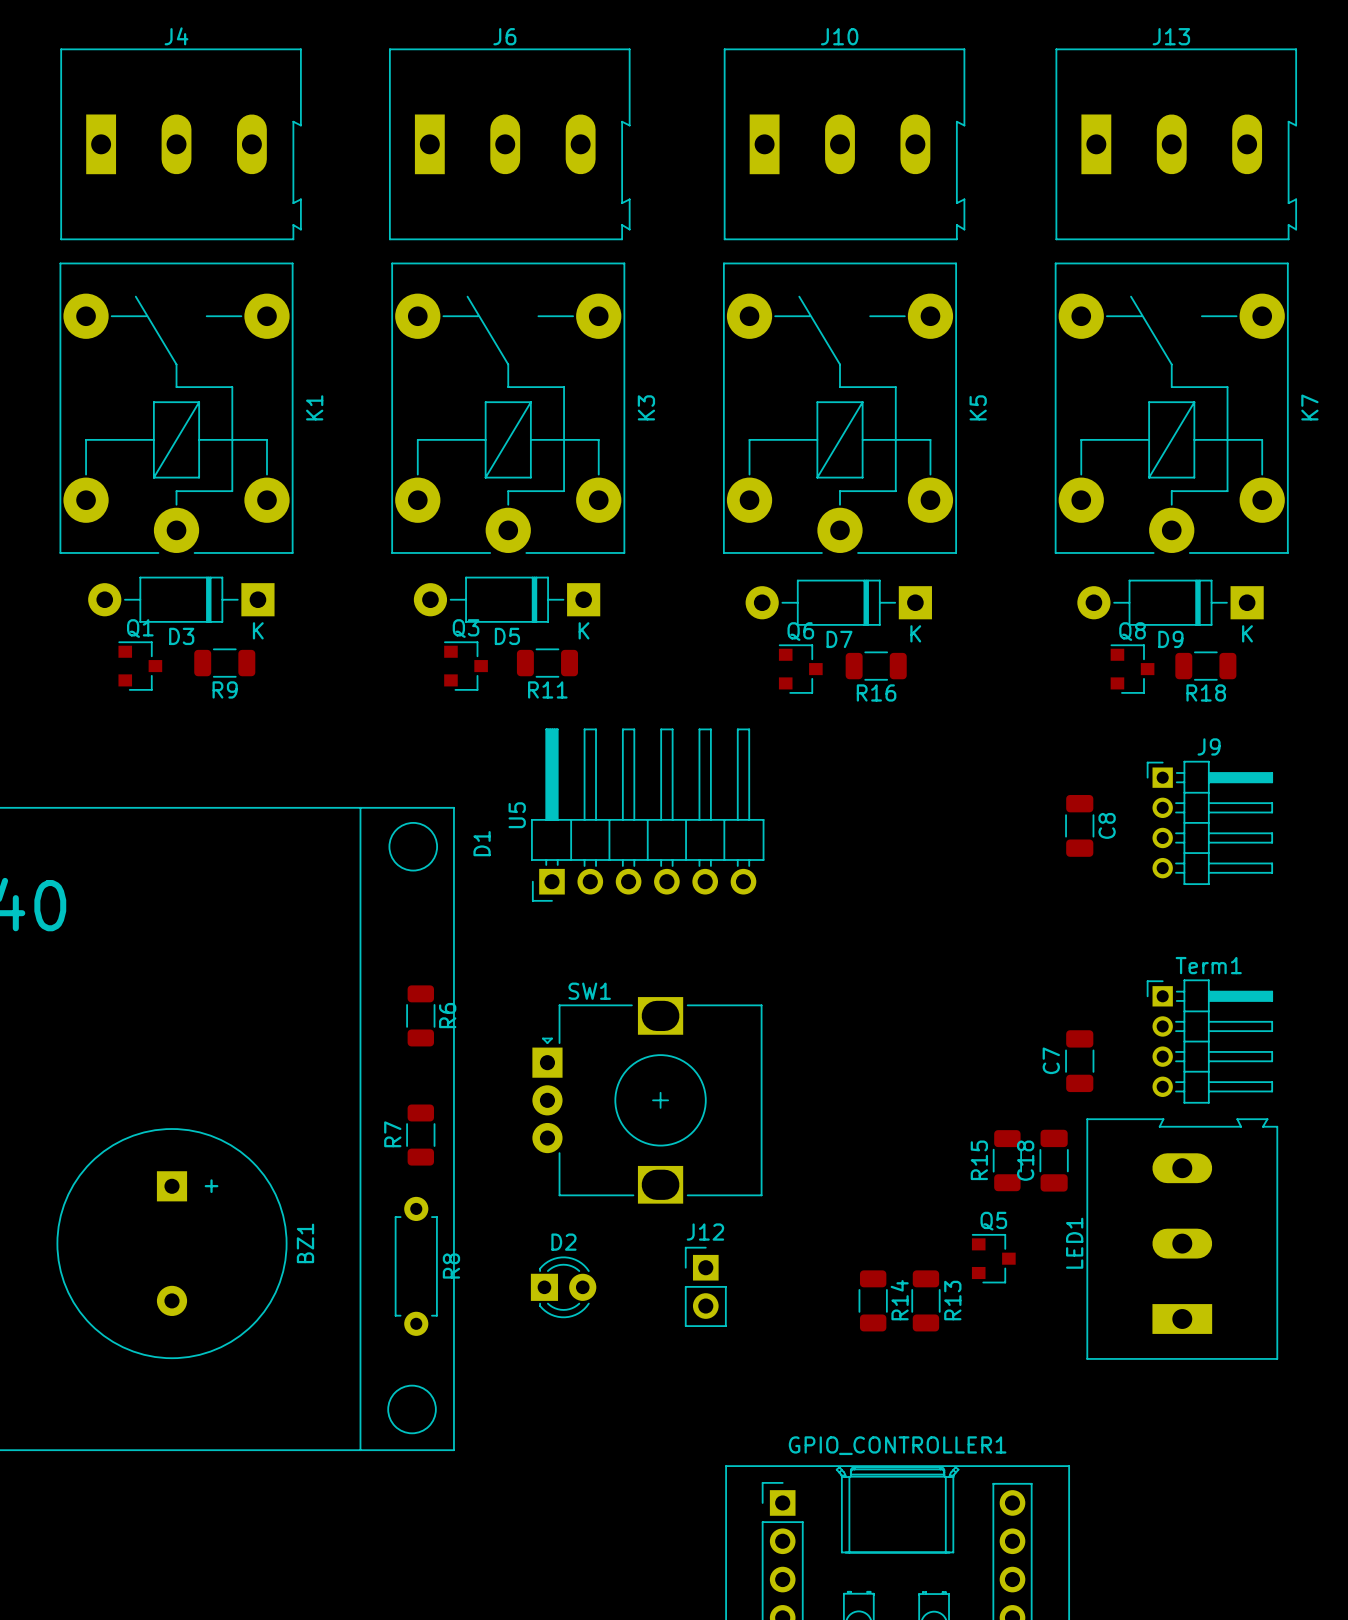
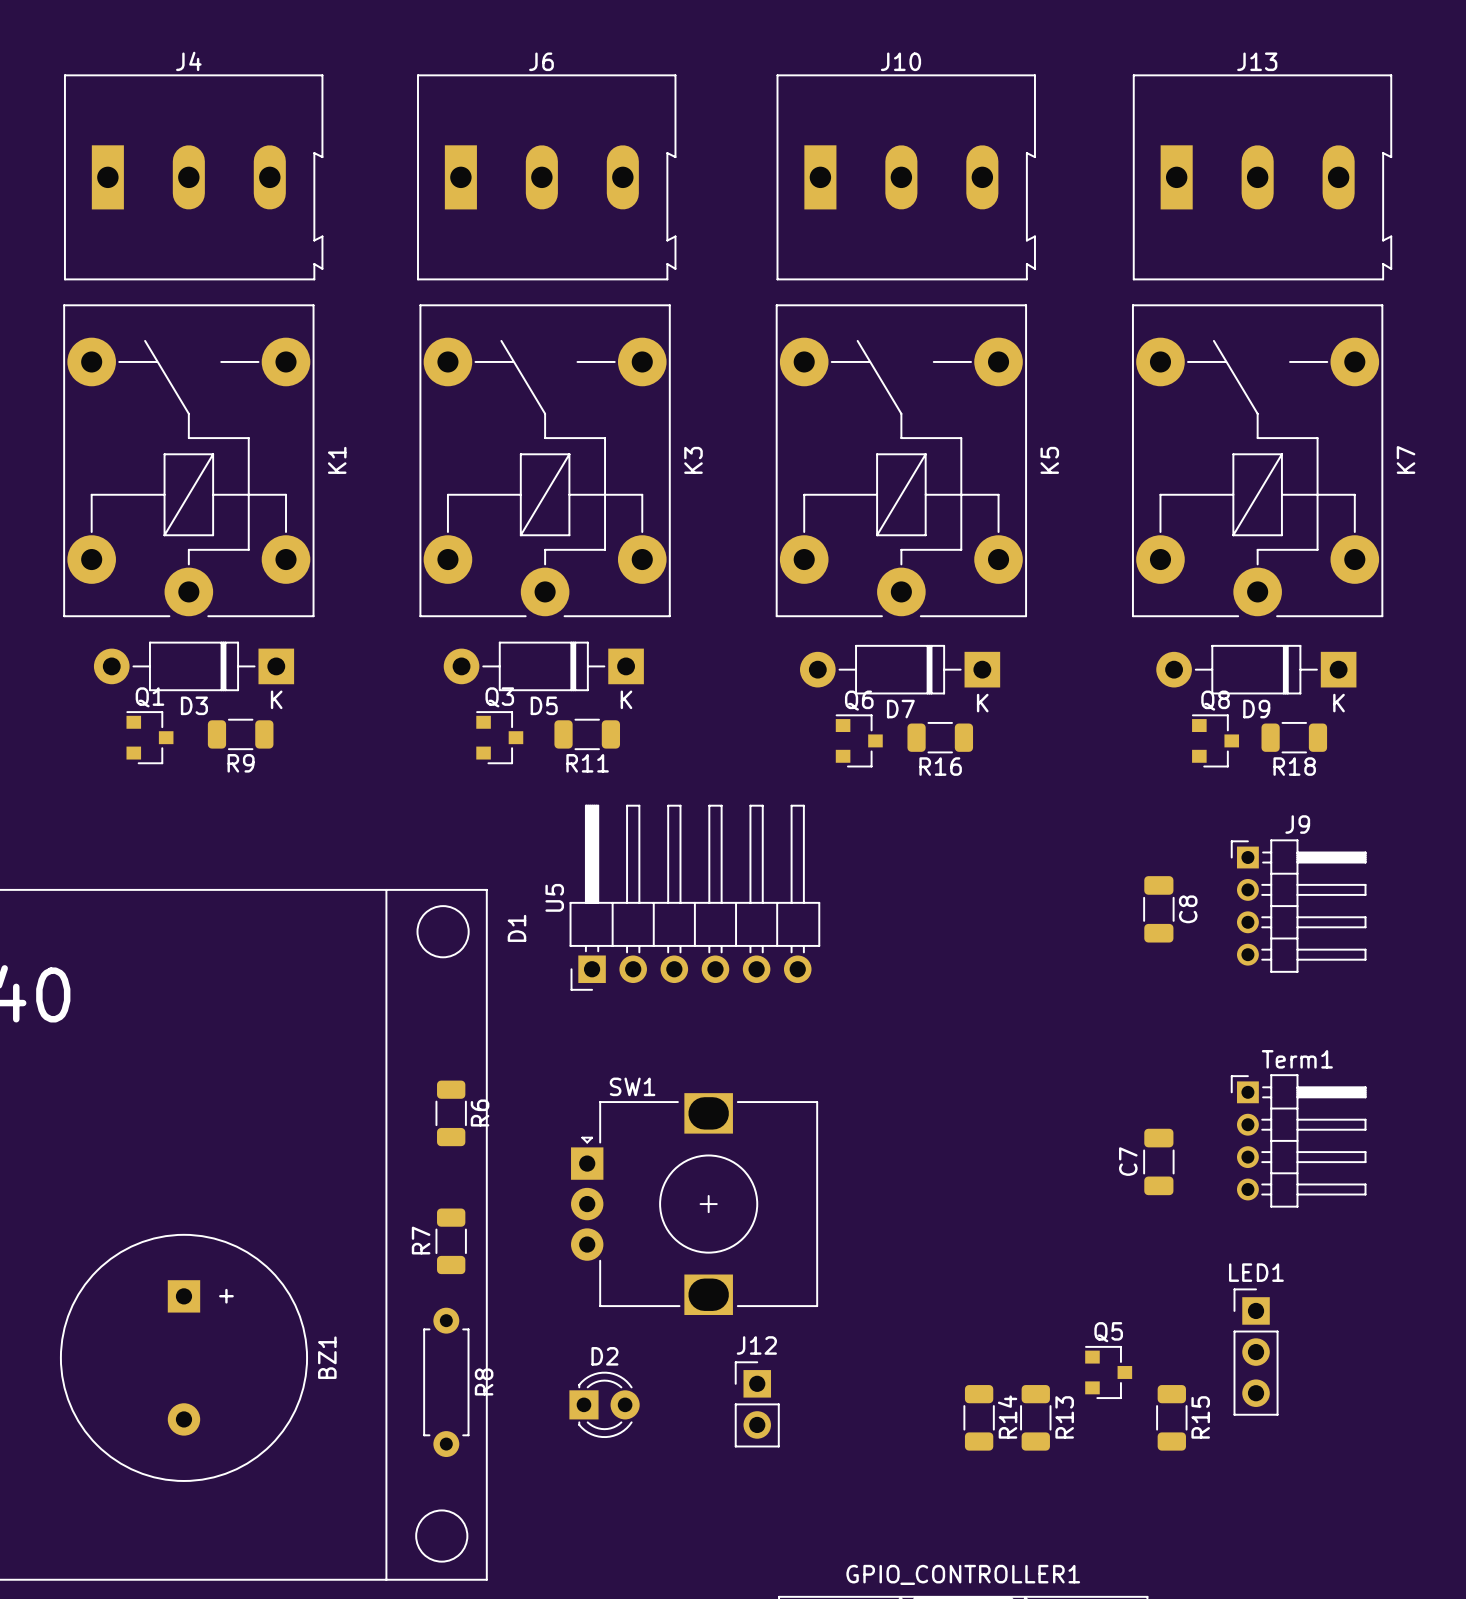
LED1 footprint: [1086, 1118, 1279, 1360] -> [1233, 1288, 1279, 1416]
R15 name position: R15 (979, 1160) -> R15 (1200, 1417)
R15 position: (1007, 1160) -> (1171, 1417)
C18: (1054, 1160) -> none
LED1 name position: LED1 (1074, 1243) -> LED1 (1256, 1272)
Q5 position: (993, 1258) -> (1108, 1372)
R14 position: (873, 1300) -> (979, 1417)
R13 position: (925, 1300) -> (1035, 1417)

